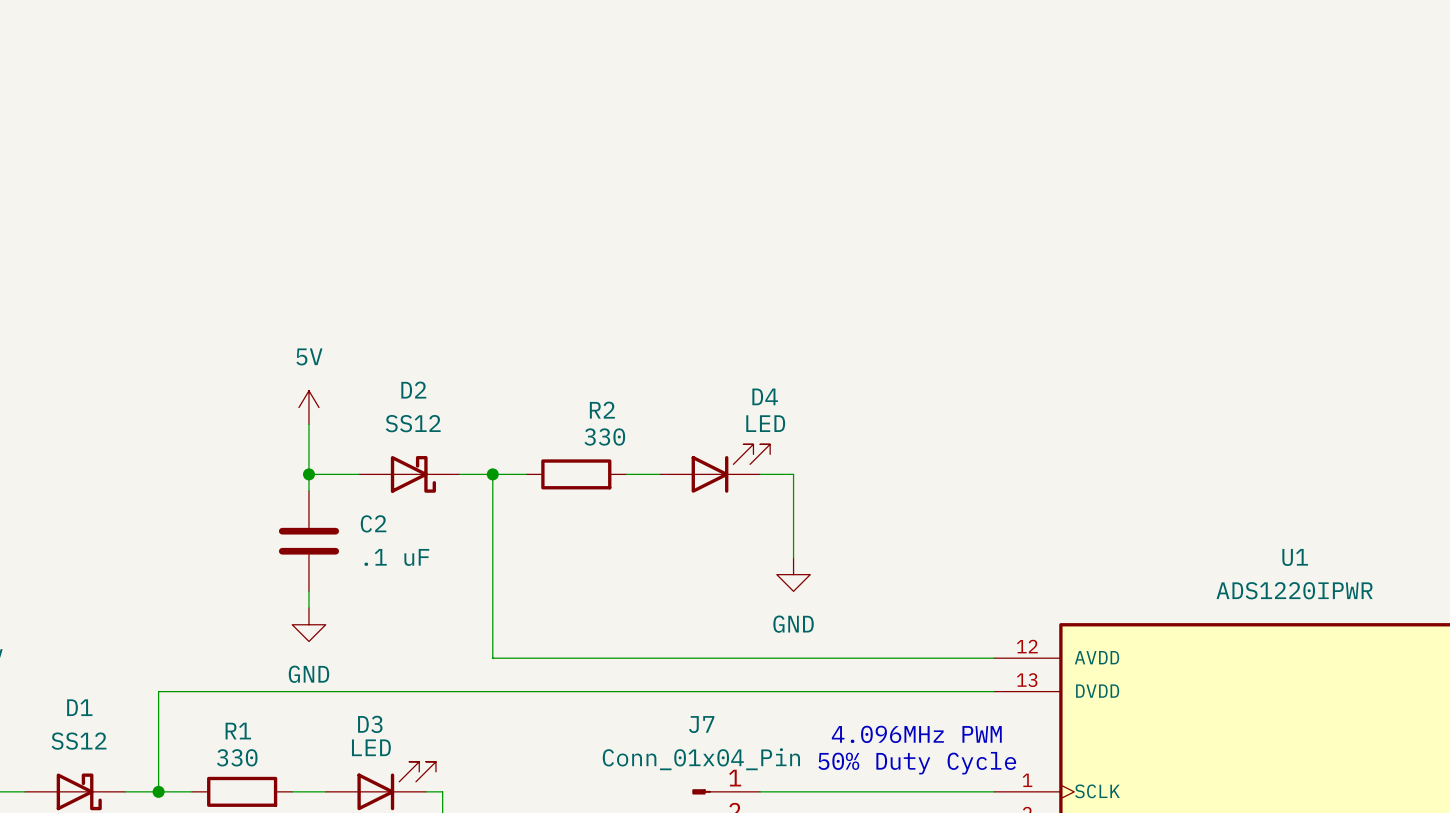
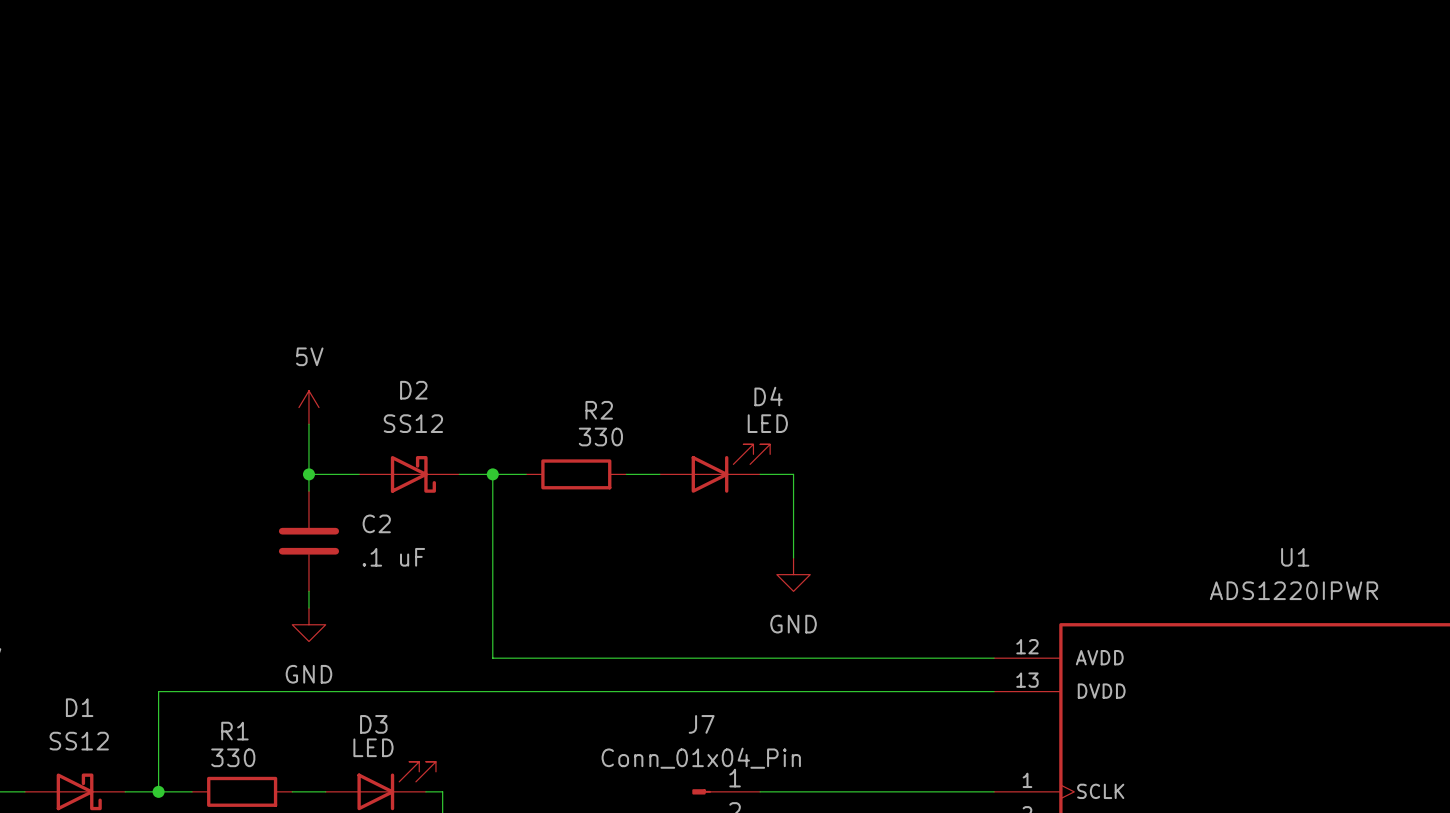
text: 4.096MHz PWM (916, 734) -> none
text: 50% Duty Cycle (917, 763) -> none

